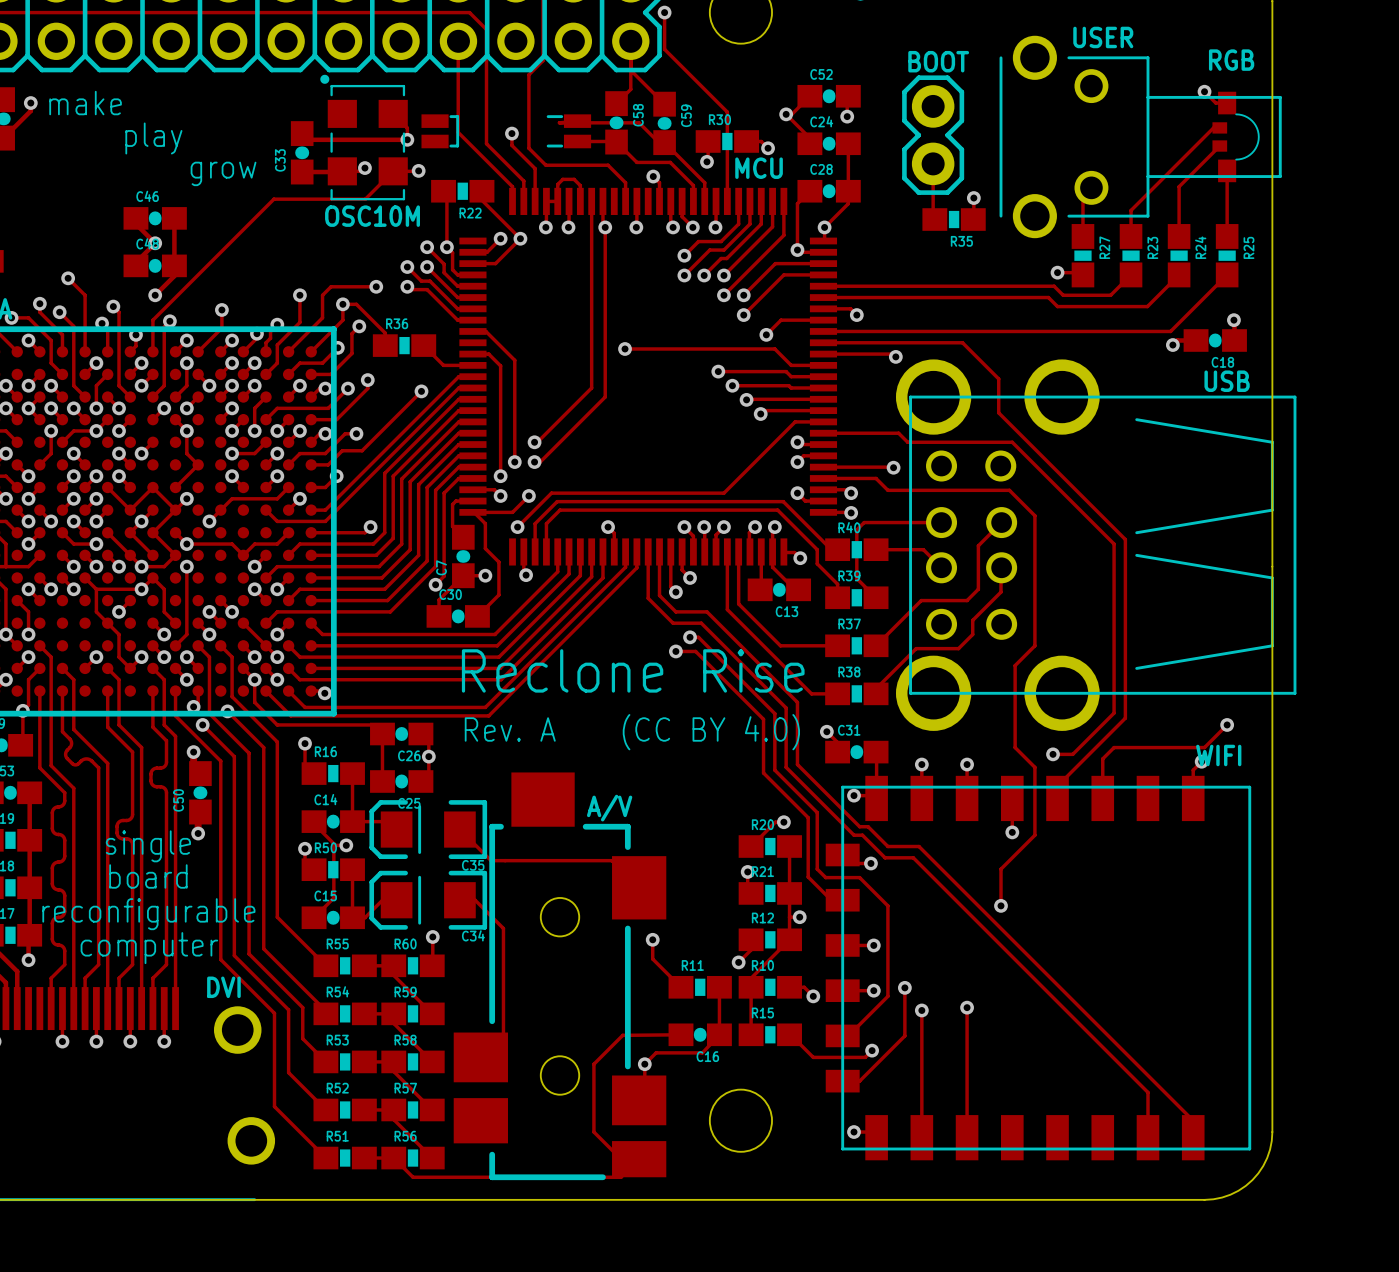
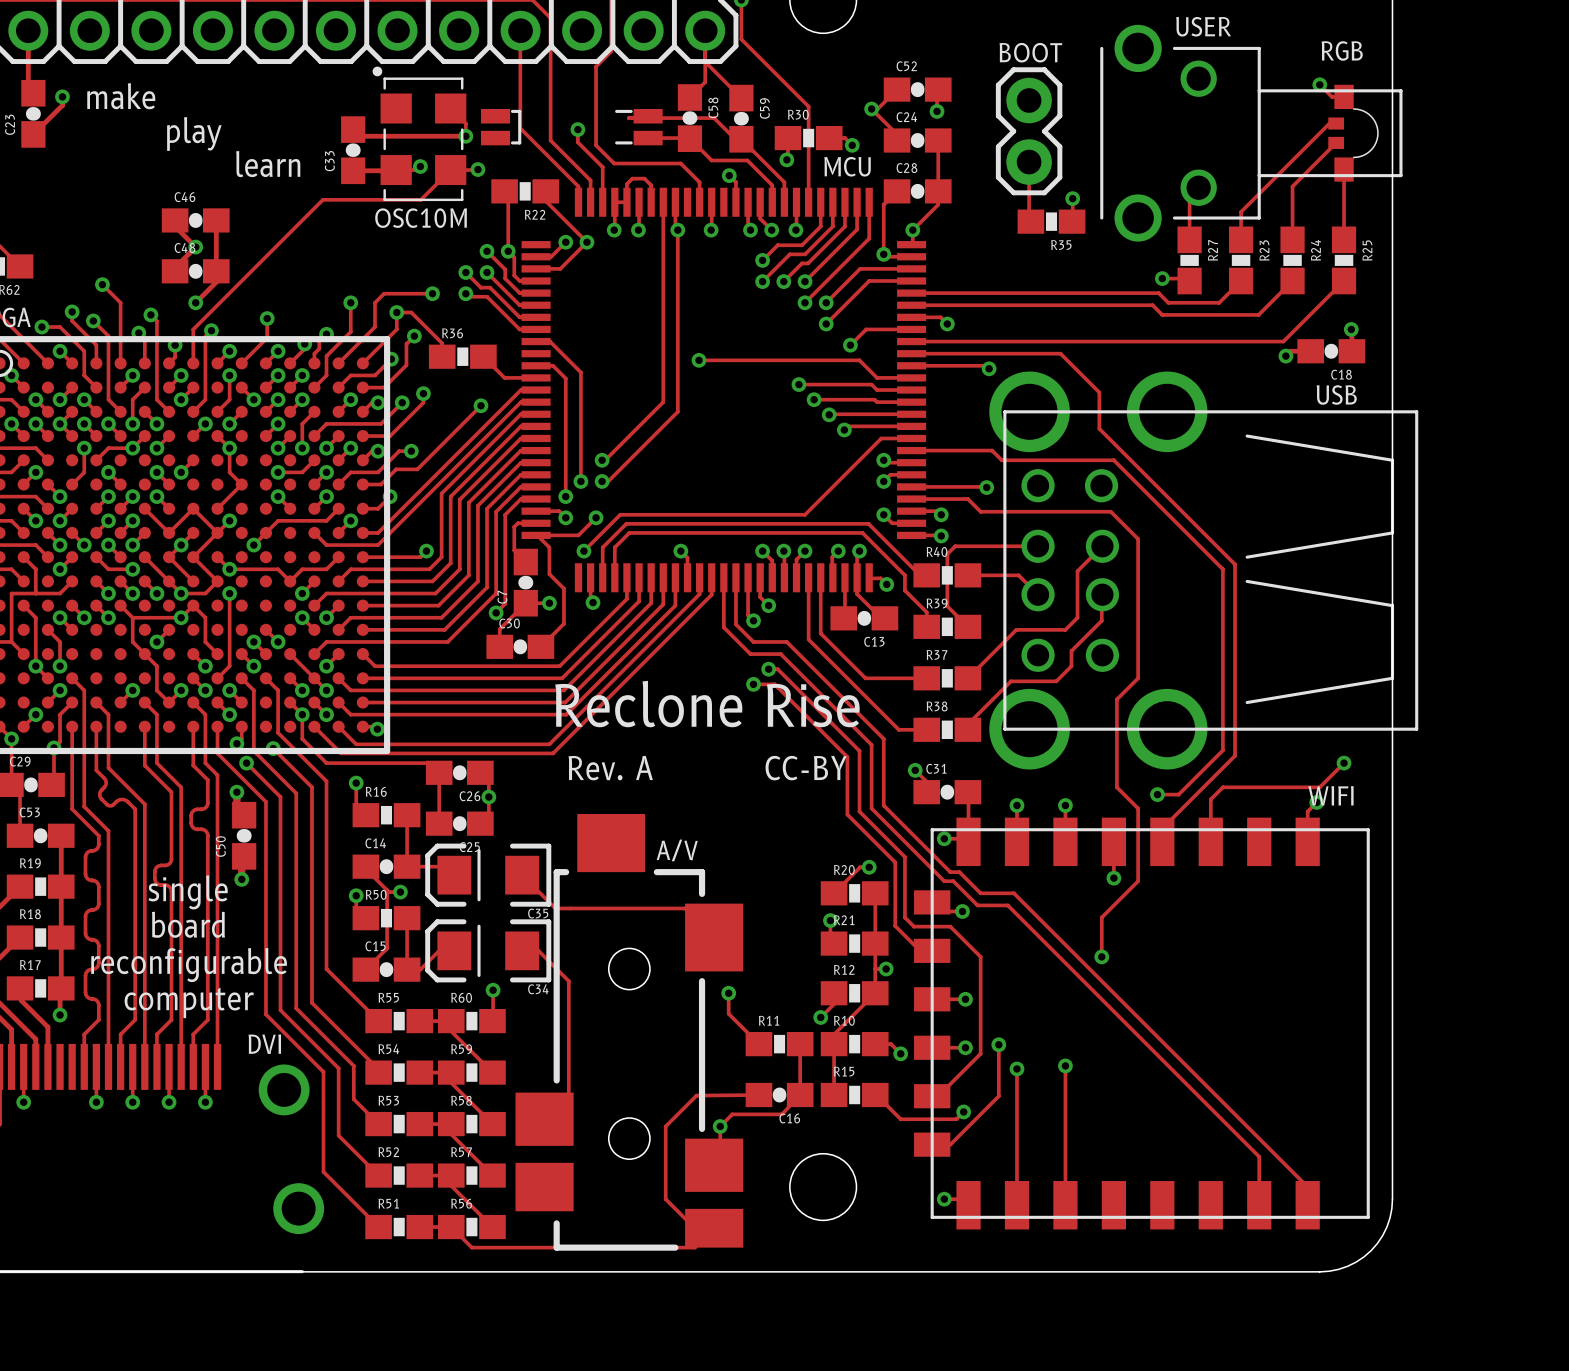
text: grow (223, 173) -> learn (268, 164)
text: Rev. A (CC BY 4.0) (632, 732) -> Rev. A CC-BY (707, 768)

